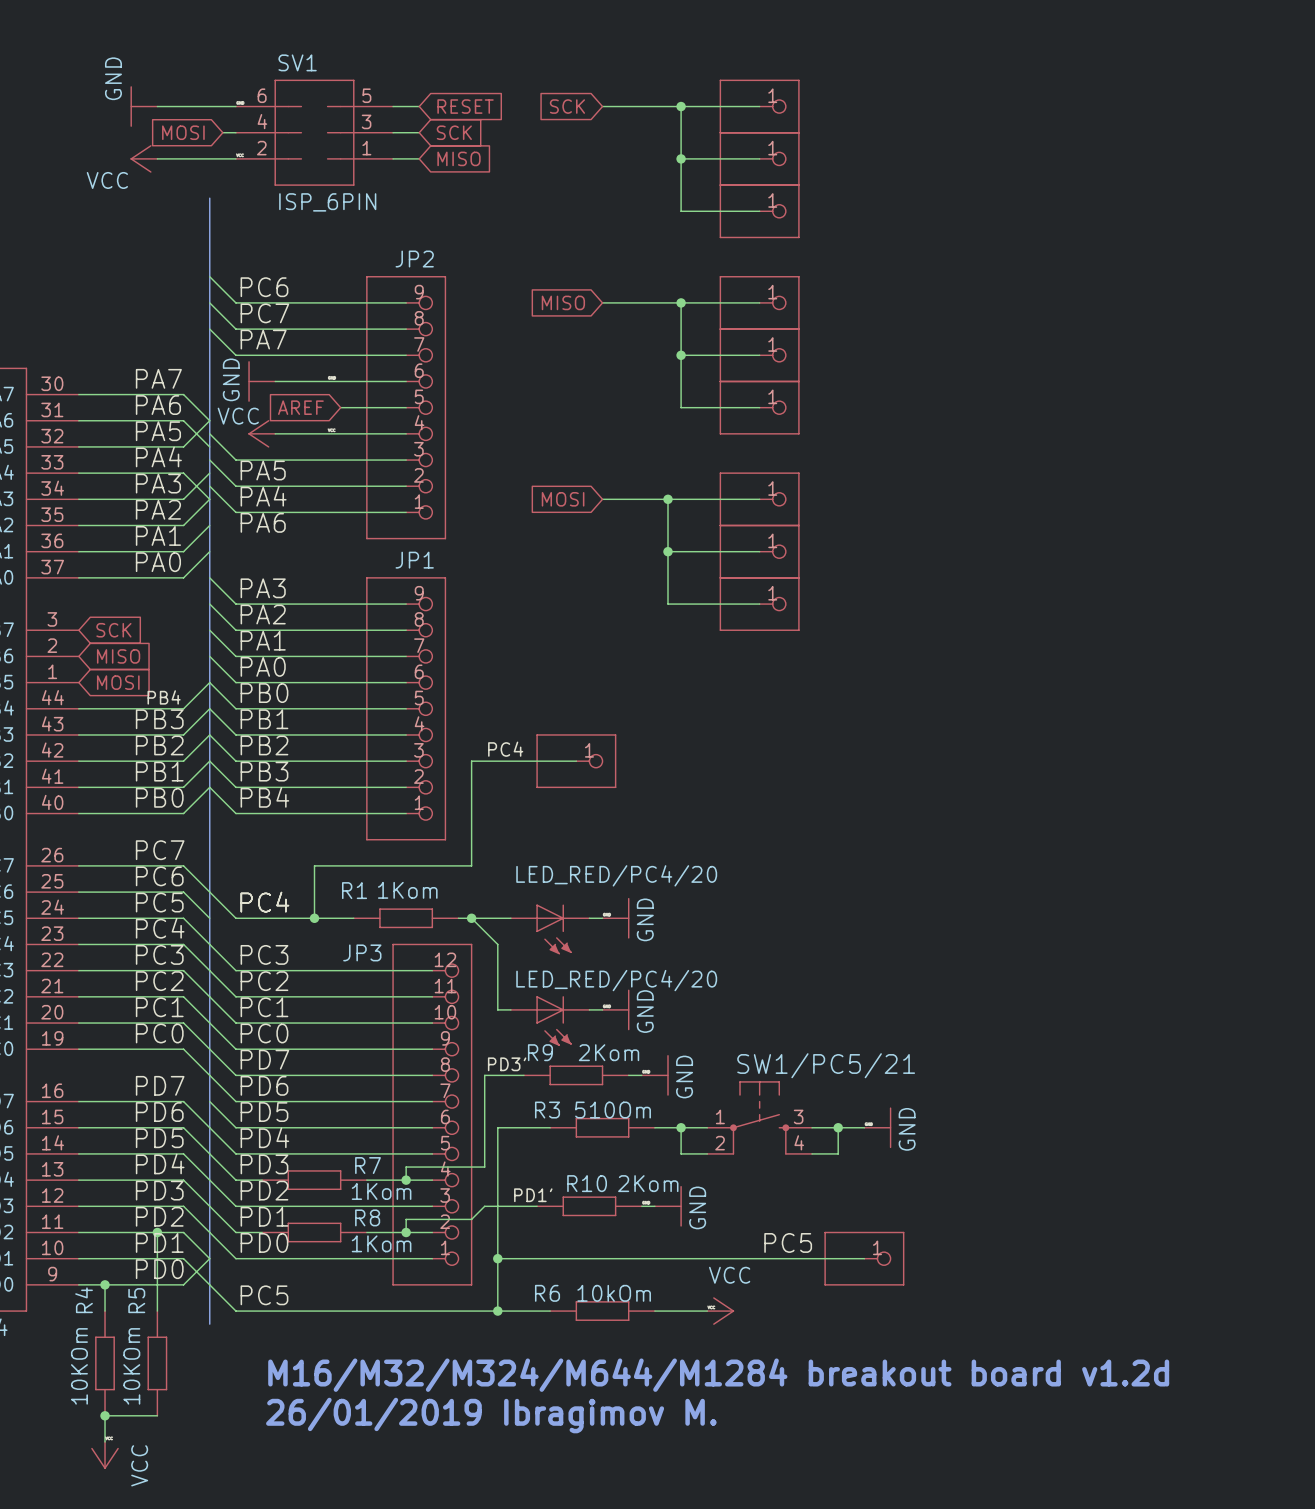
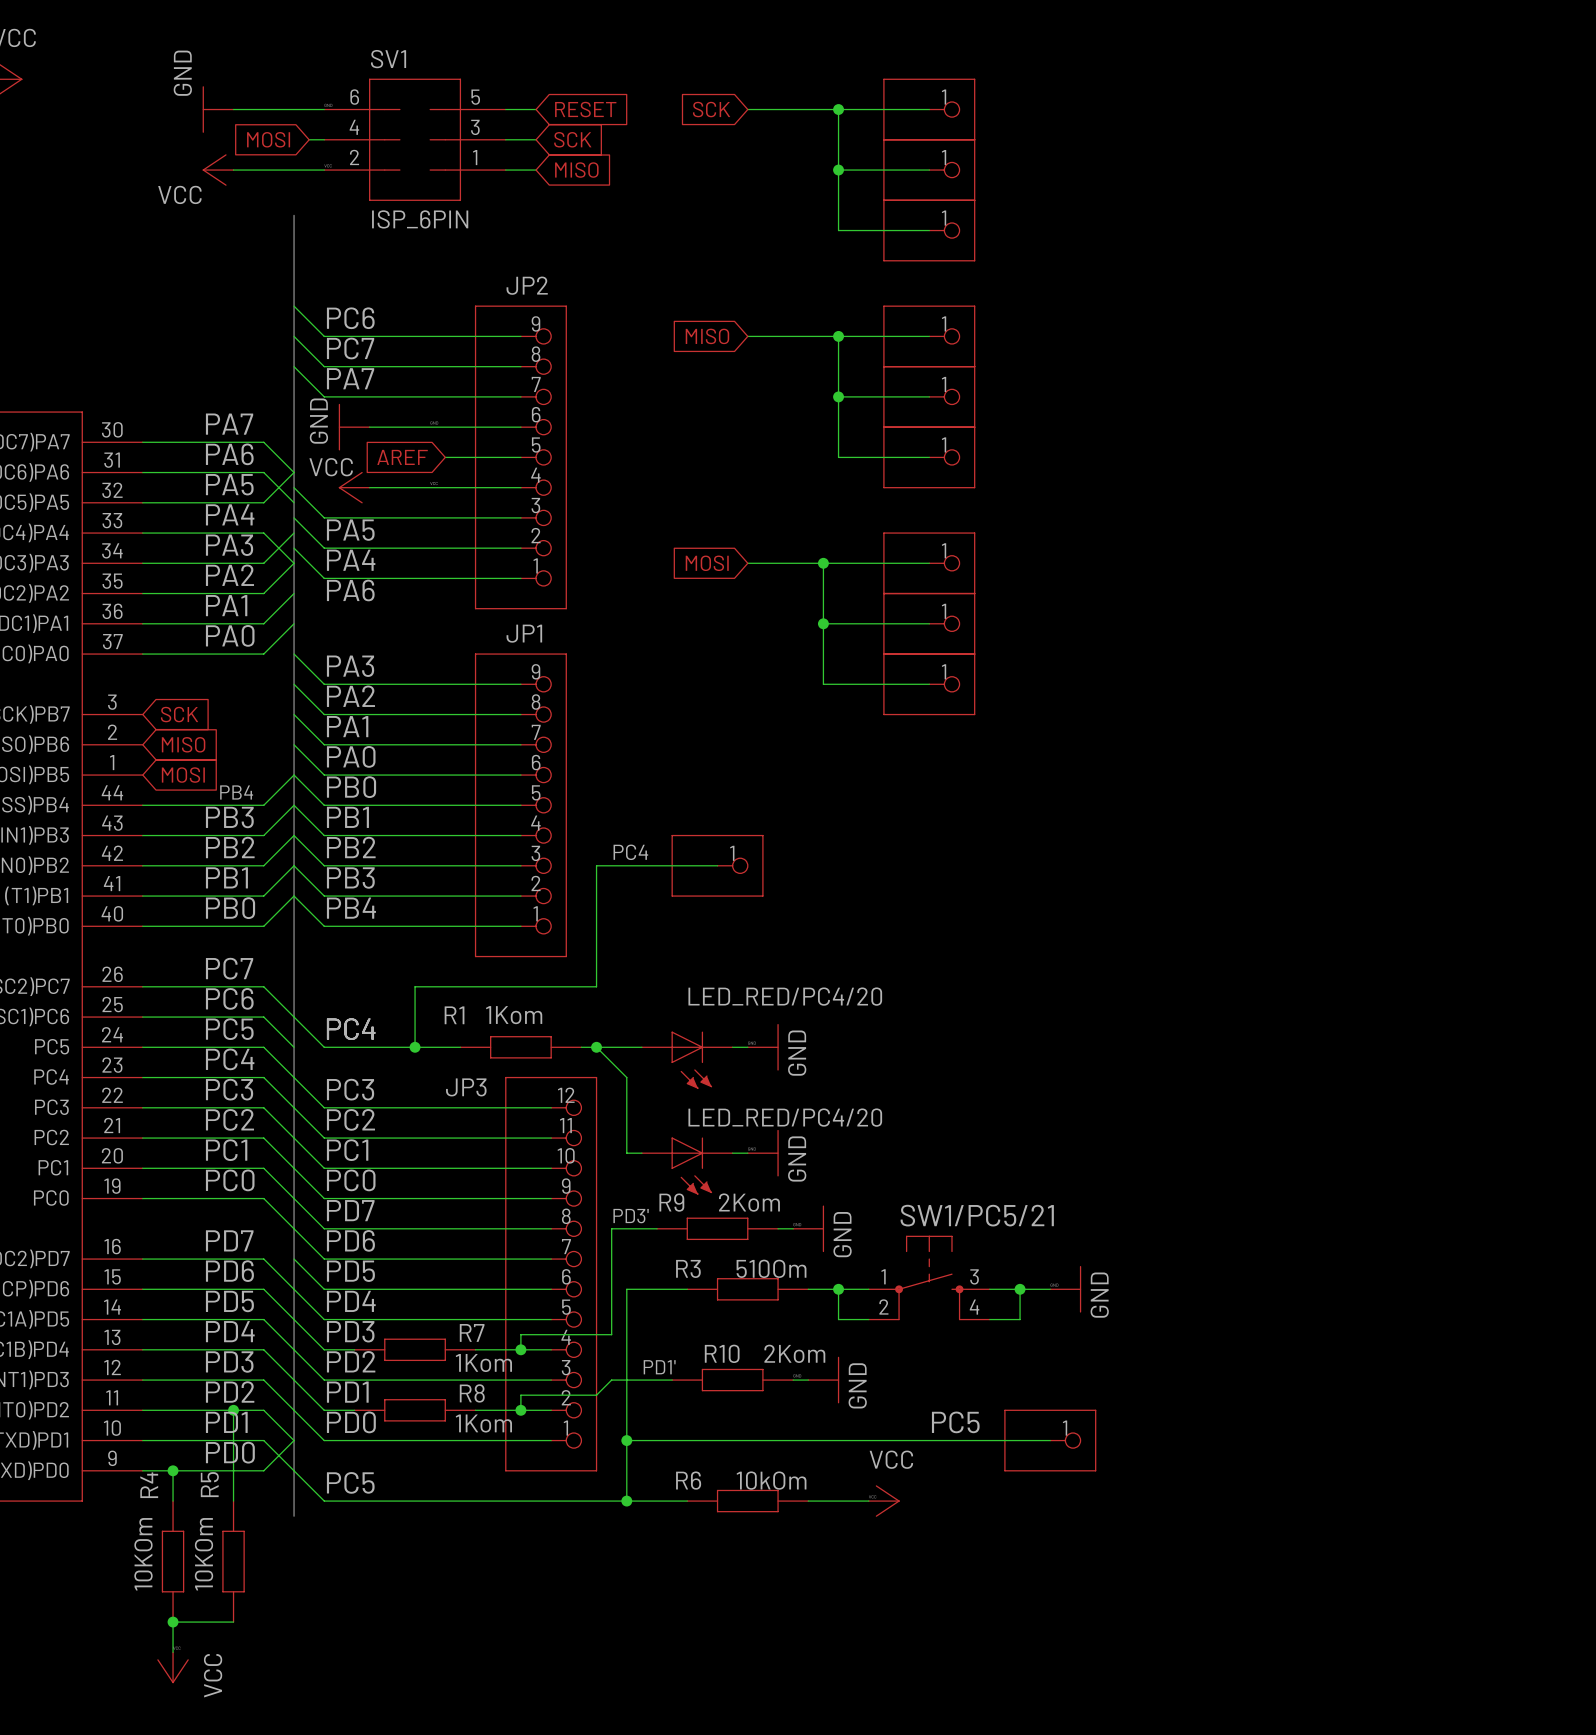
text: M16/M32/M324/M644/M1284 breakout board v1.2d (718, 1375) -> none
text: 26/01/2019 Ibragimov M. (491, 1415) -> none

